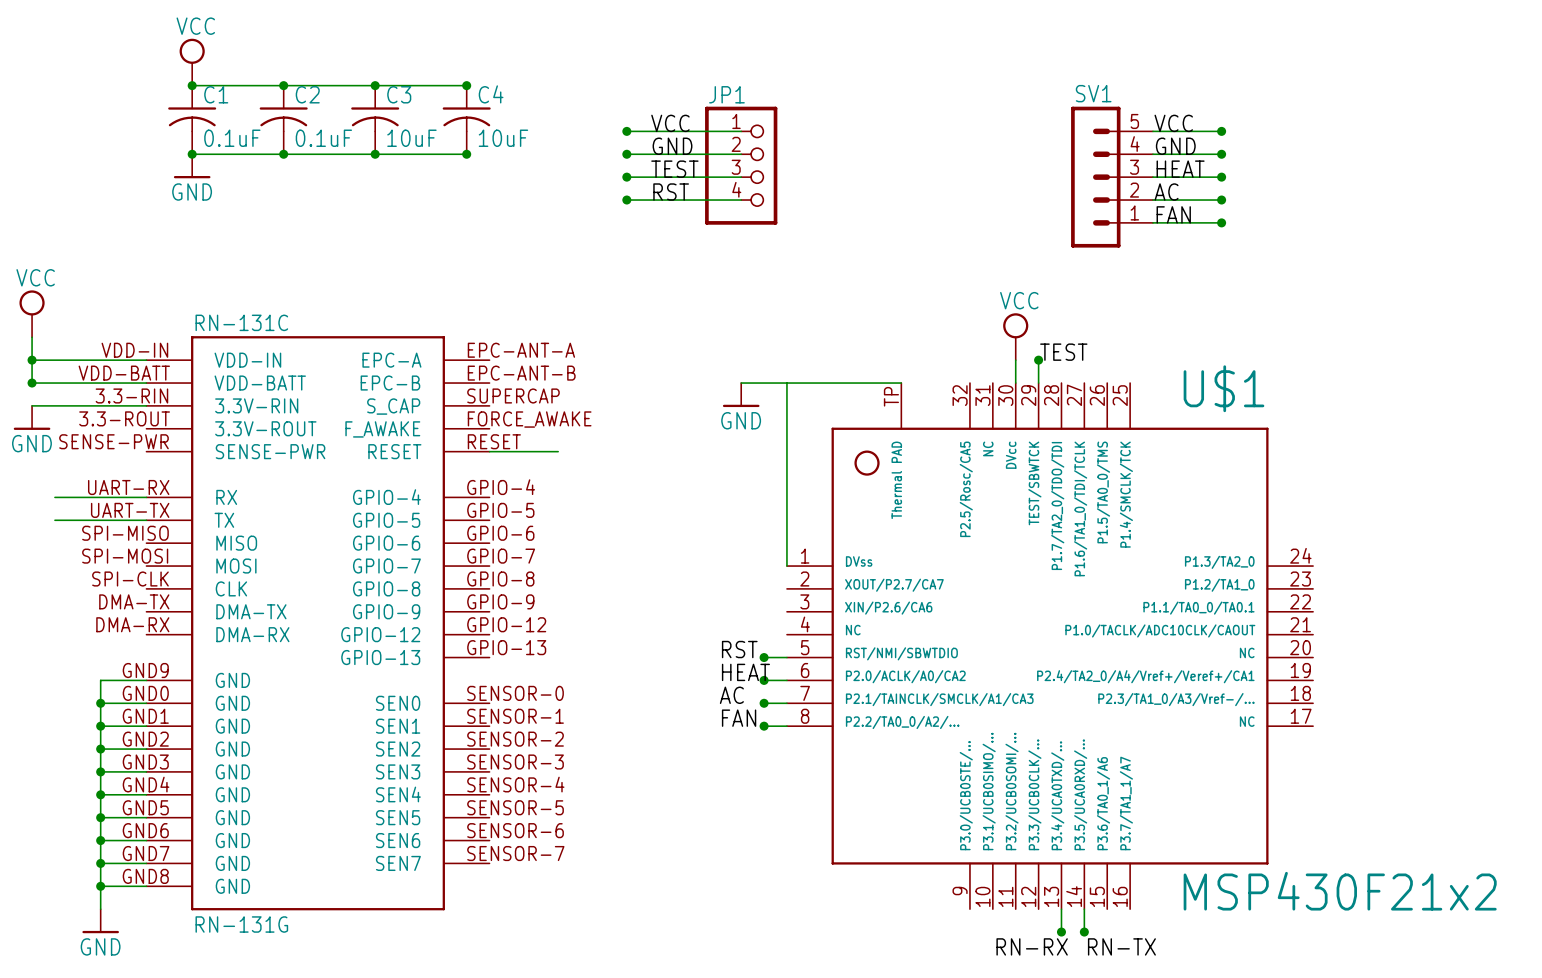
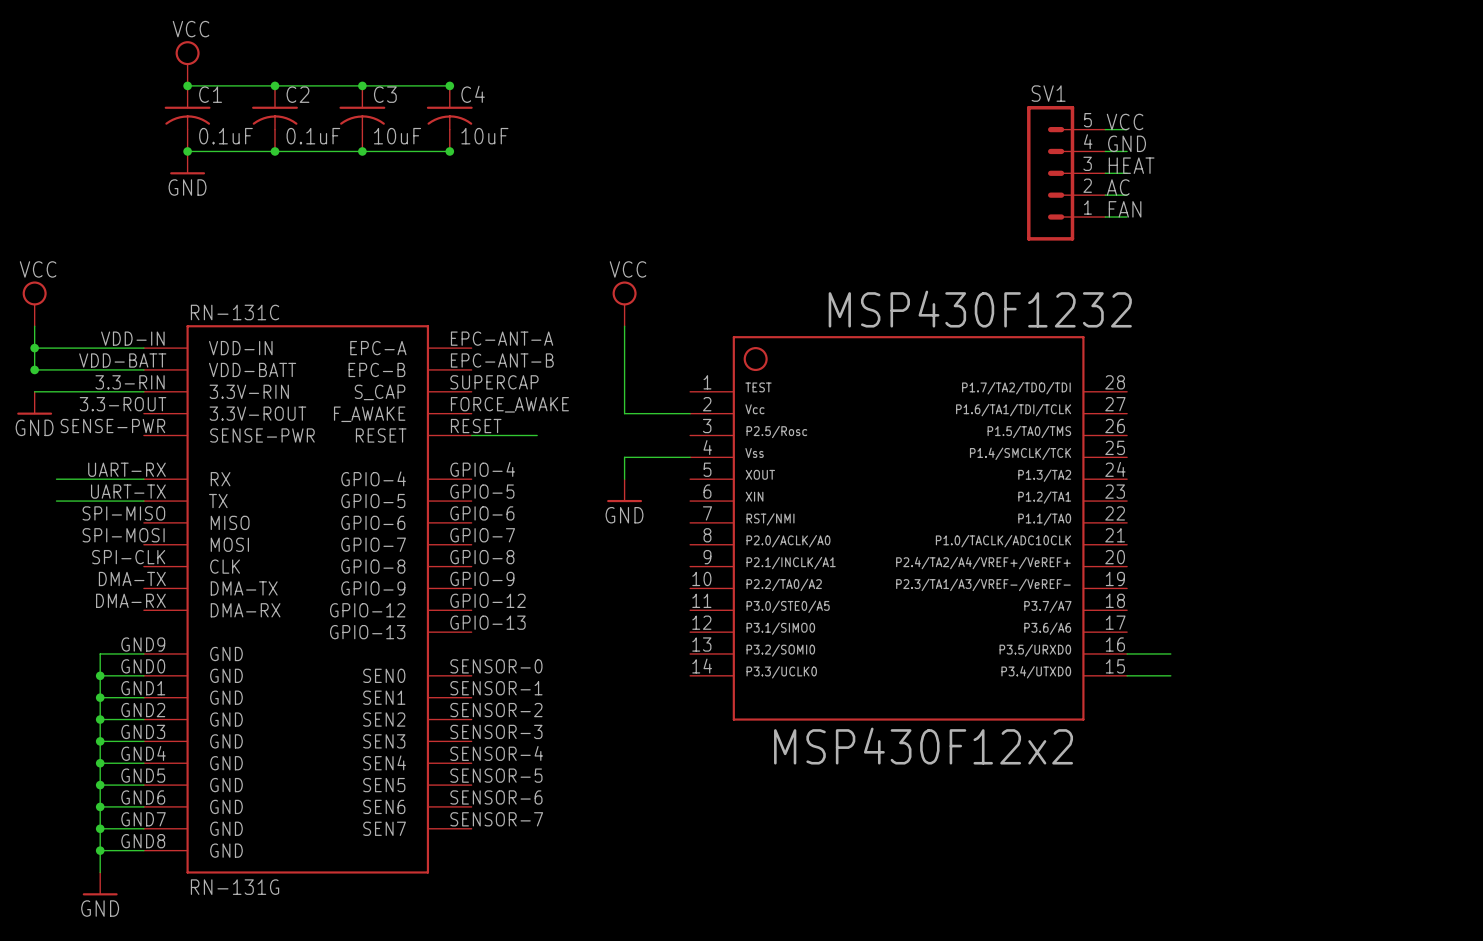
label: VCC (670, 123) -> none
wire: (626, 131) (741, 131) -> none
junction: (626, 131) -> none
wire: (1175, 131) (1221, 131) -> none
junction: (1221, 131) -> none
label: GND (672, 146) -> none
wire: (626, 154) (741, 154) -> none
junction: (626, 154) -> none
wire: (1175, 154) (1221, 154) -> none
junction: (1221, 154) -> none
JP1: (741, 165) -> none
label: TEST (674, 169) -> none
wire: (626, 177) (741, 177) -> none
junction: (626, 177) -> none
wire: (1175, 177) (1221, 177) -> none
junction: (1221, 177) -> none
label: RST (671, 192) -> none
wire: (626, 200) (741, 200) -> none
junction: (626, 200) -> none
wire: (1175, 200) (1221, 200) -> none
junction: (1221, 200) -> none
wire: (1175, 222) (1221, 222) -> none
junction: (1221, 222) -> none
power symbol: none -> VCC (624, 303)
power symbol: VCC (1015, 336) -> none
wire: none -> (624, 326) (624, 413) (690, 413)
label: TEST (1063, 352) -> none
wire: (1015, 360) (1015, 383) -> none
wire: (1038, 360) (1038, 383) -> none
junction: (1038, 360) -> none
wire: (741, 383) (901, 383) -> none
wire: (786, 383) (786, 566) -> none
power symbol position: GND (741, 395) -> GND (624, 490)
wire: none -> (690, 457) (624, 457) (624, 479)
MSP430F1232: none -> (908, 528)
U$1: (1050, 646) -> none
label: RST (739, 649) -> none
wire: (764, 657) (786, 657) -> none
junction: (764, 657) -> none
label: HEAT (745, 672) -> none
wire: (764, 680) (786, 680) -> none
junction: (764, 680) -> none
wire: none -> (1127, 653) (1170, 653)
label: AC (731, 695) -> none
wire: (764, 703) (786, 703) -> none
junction: (764, 703) -> none
wire: none -> (1127, 675) (1170, 675)
label: FAN (739, 718) -> none
wire: (764, 726) (786, 726) -> none
junction: (764, 726) -> none
wire: (1061, 909) (1061, 932) -> none
wire: (1084, 909) (1084, 932) -> none
junction: (1061, 932) -> none
junction: (1084, 932) -> none
label: RN-RX (1032, 946) -> none
label: RN-TX (1121, 946) -> none

